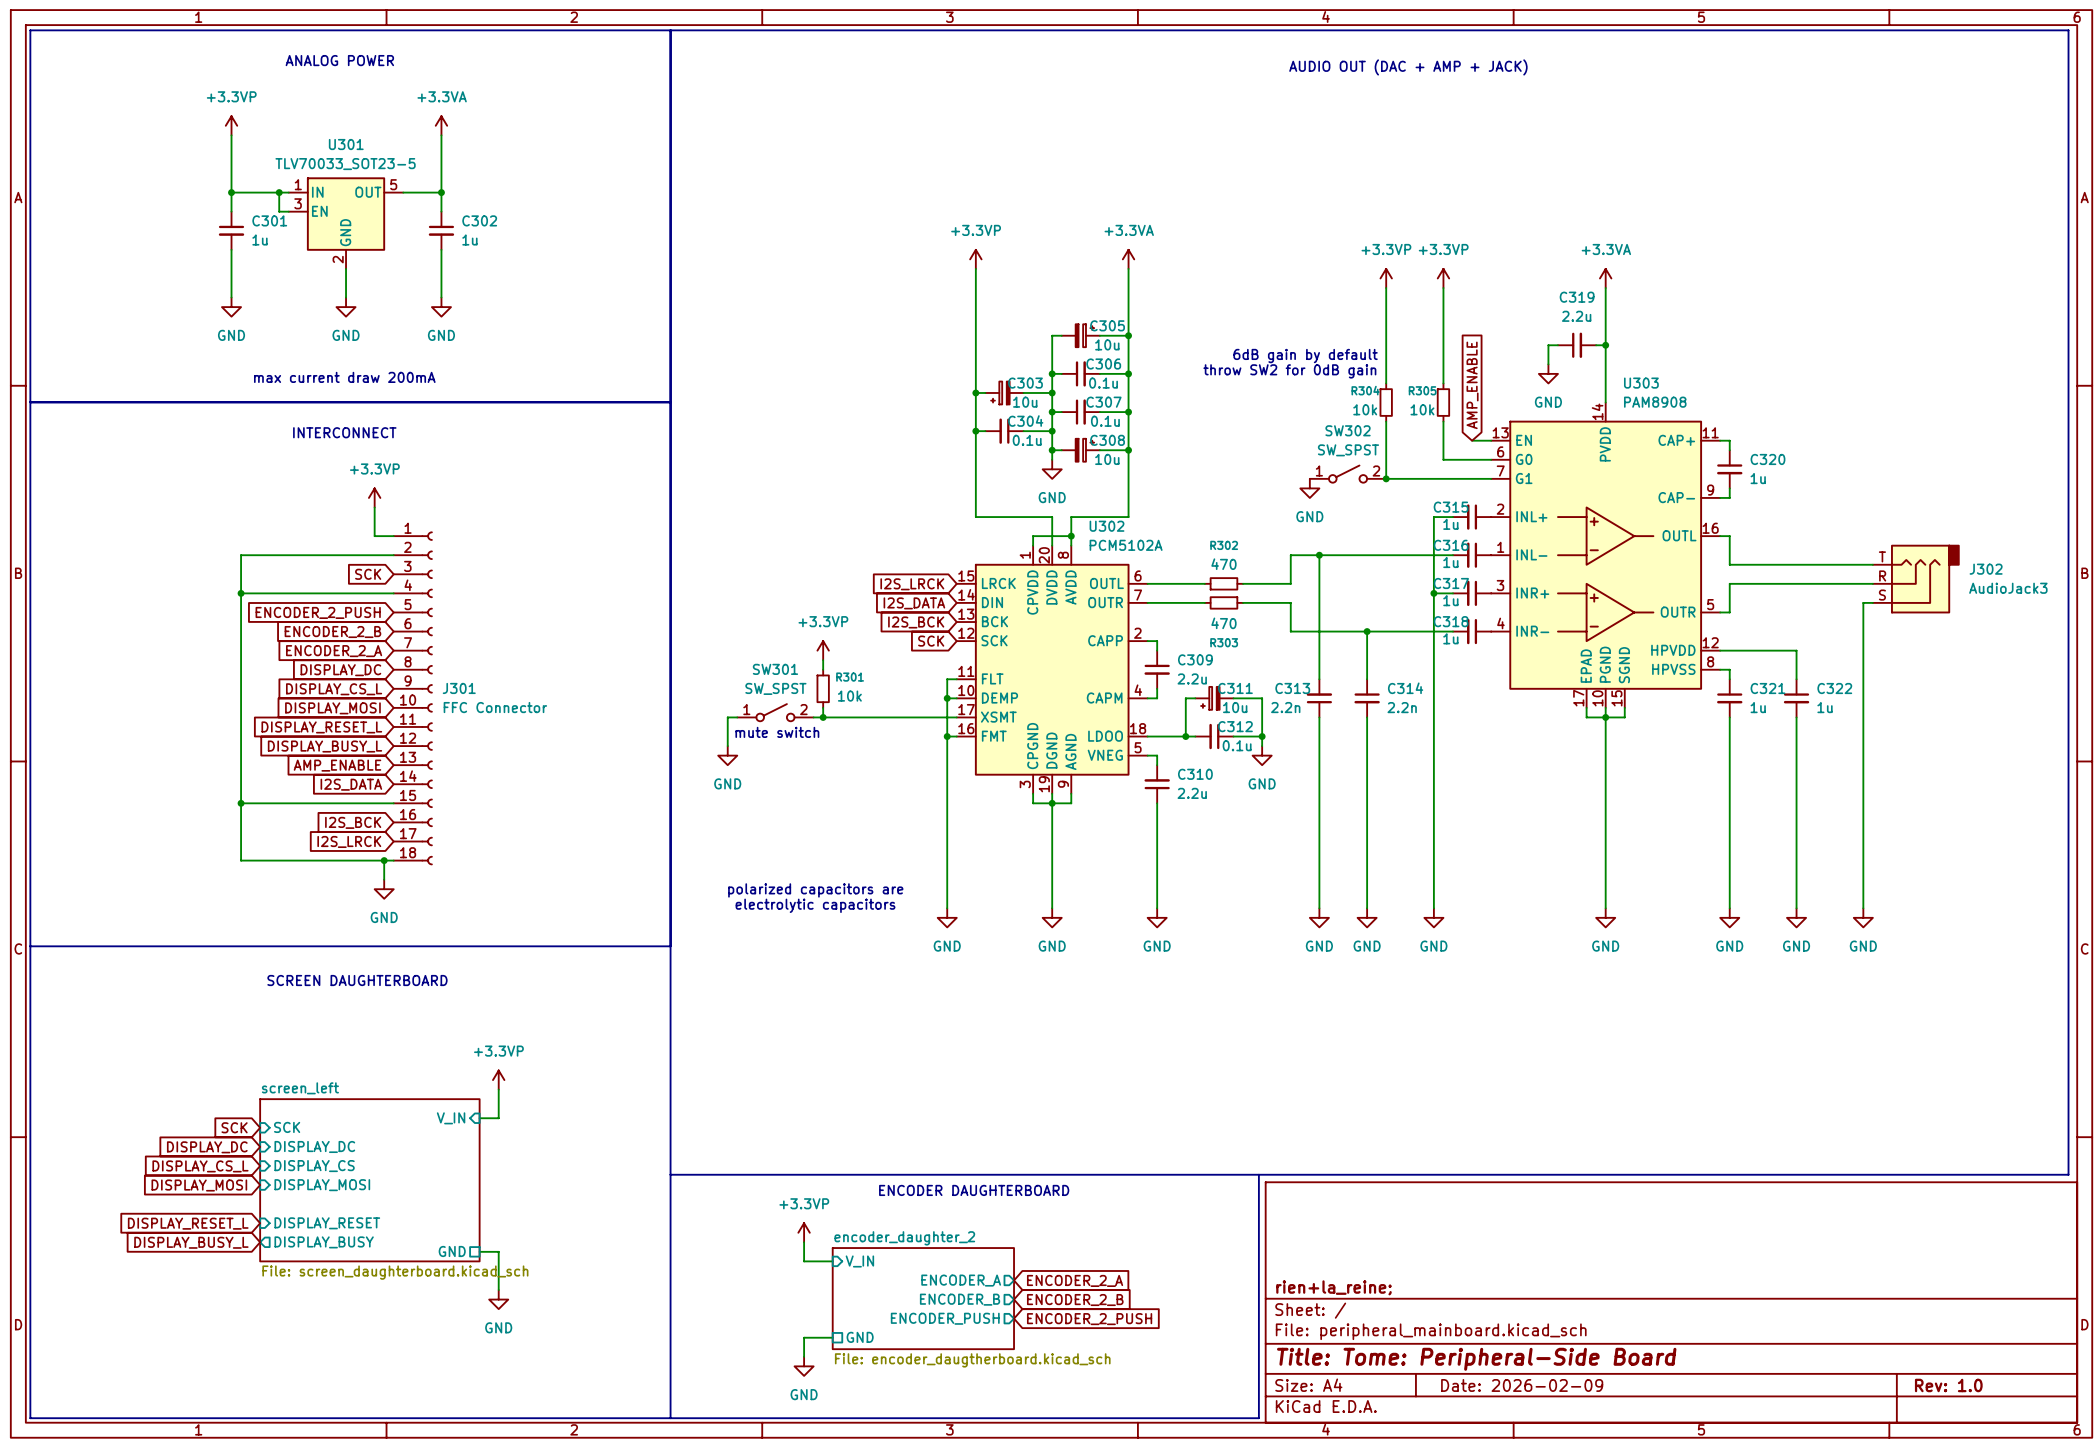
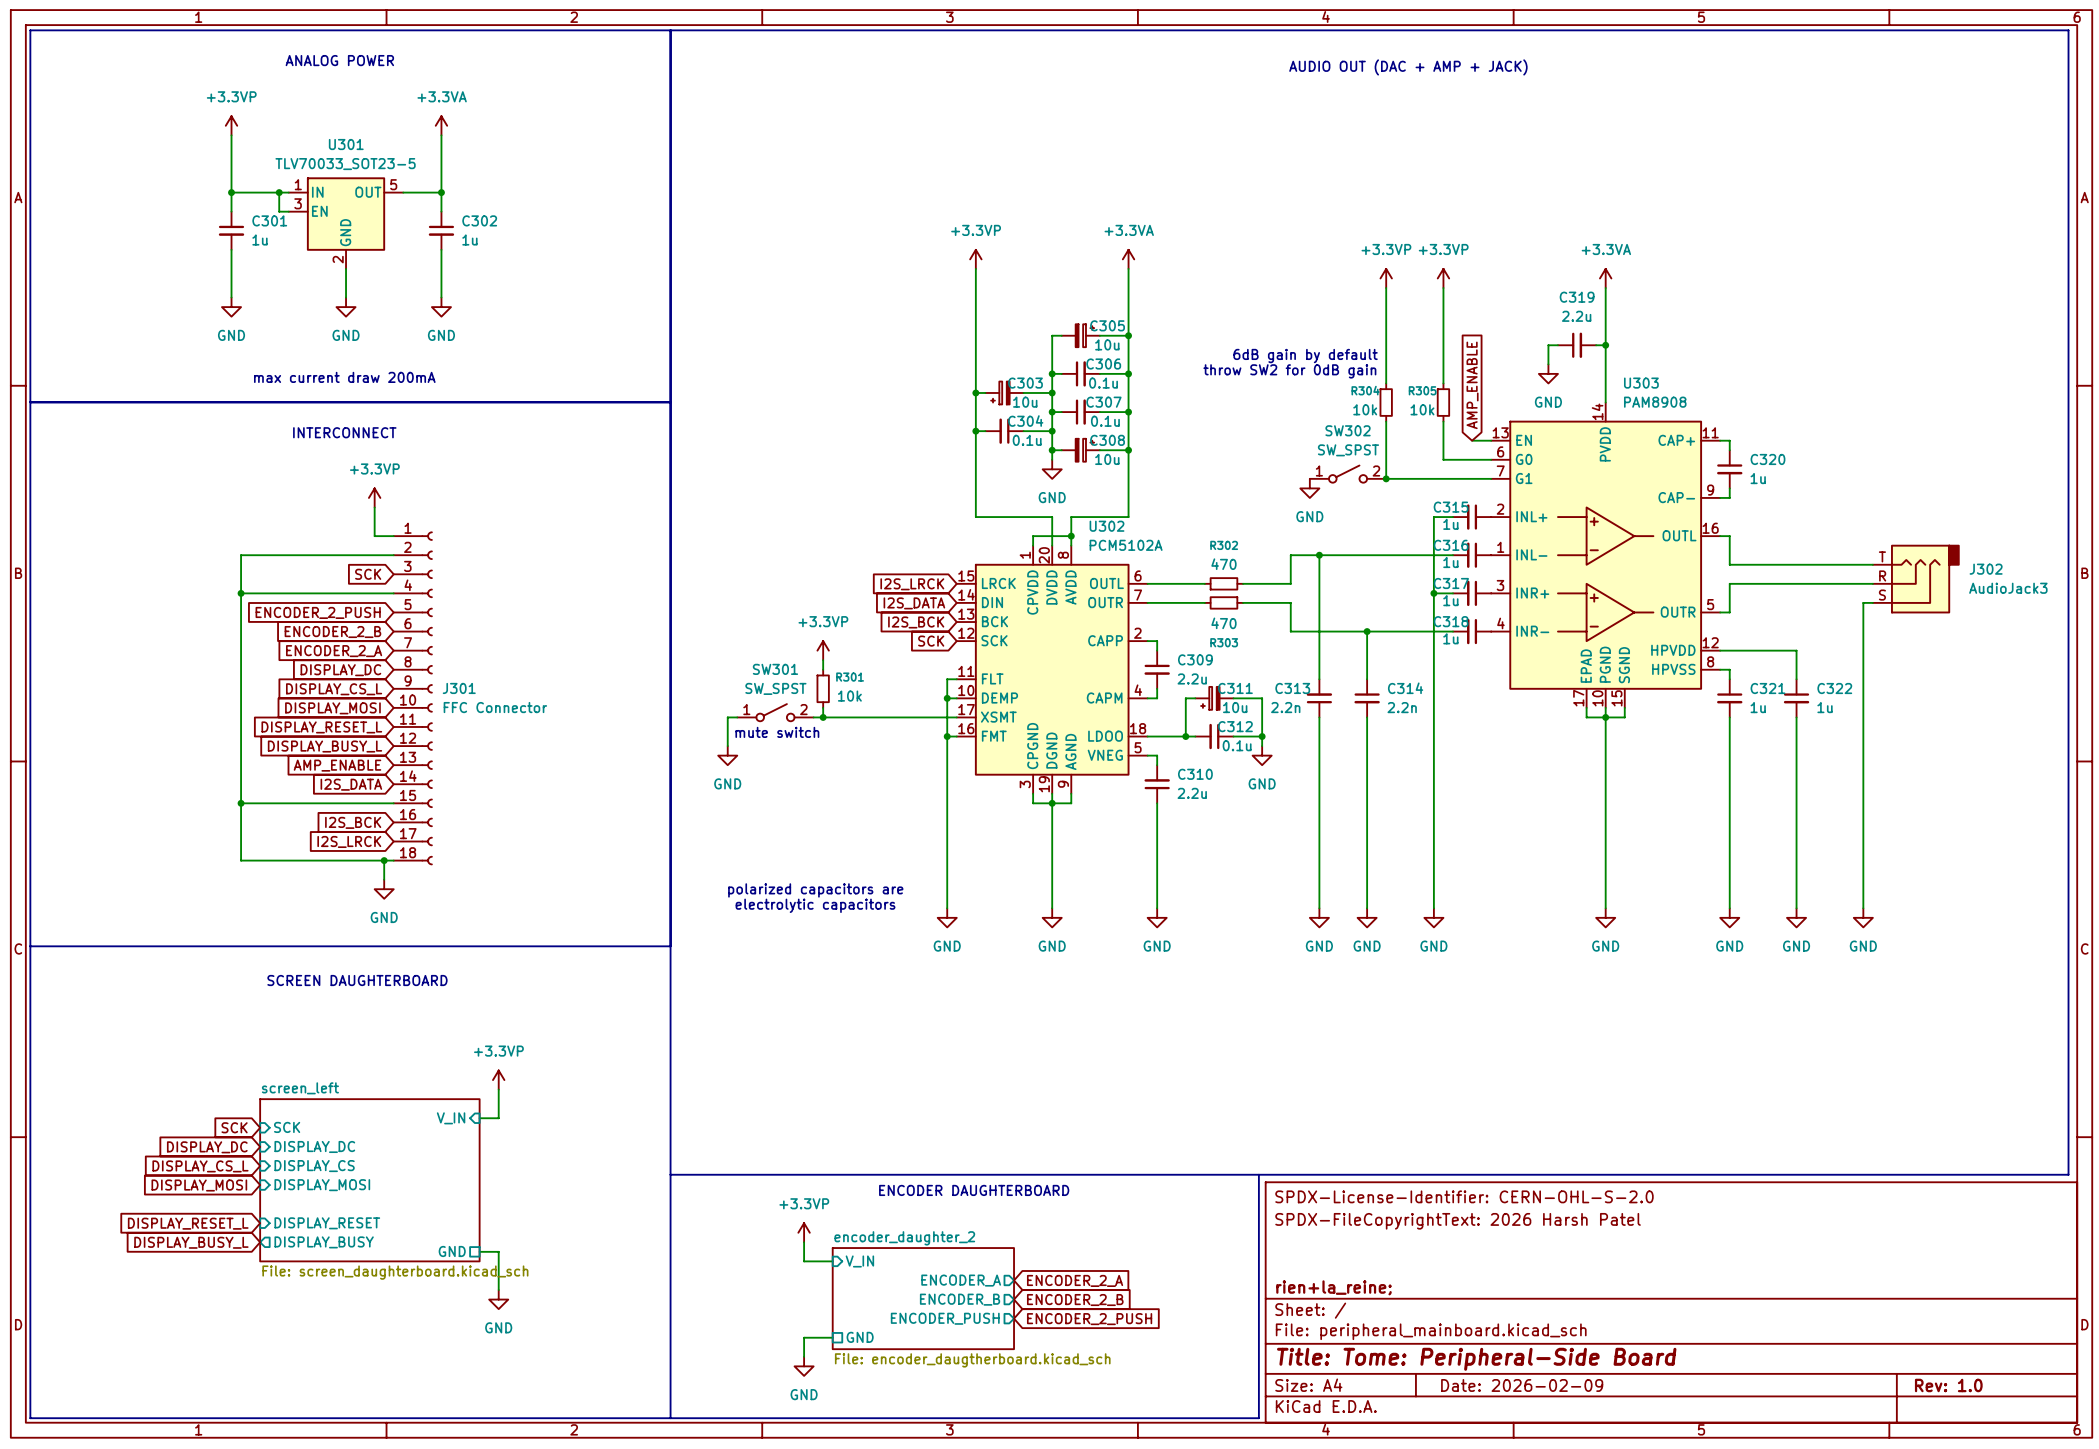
title block: none -> SPDX-License-Identifier: CERN-OHL-S-2.0 (1464, 1196)
title block: none -> SPDX-FileCopyrightText: 2026 Harsh Patel (1458, 1221)

